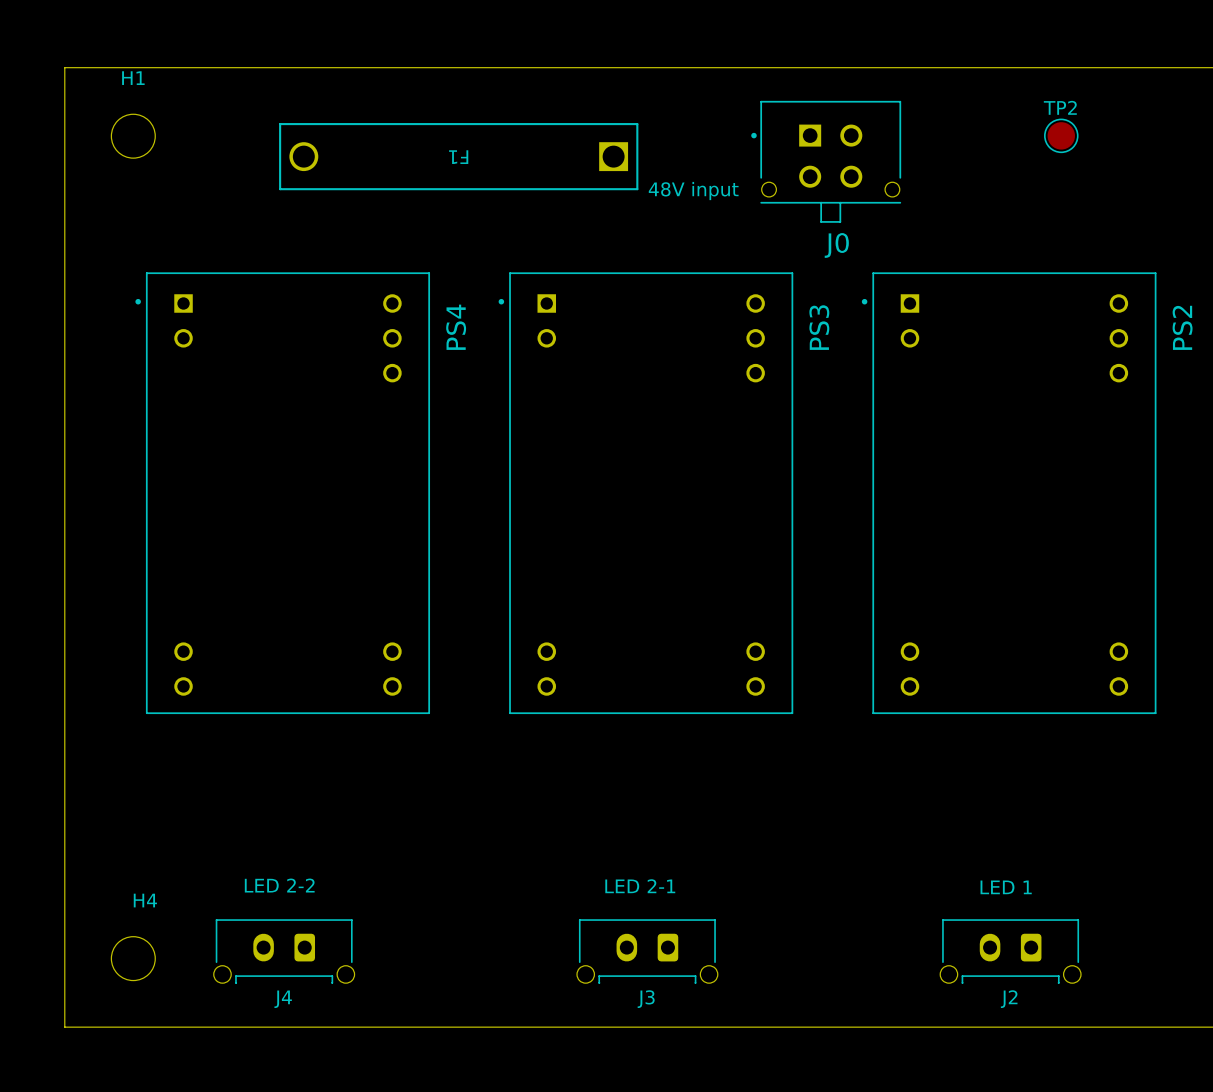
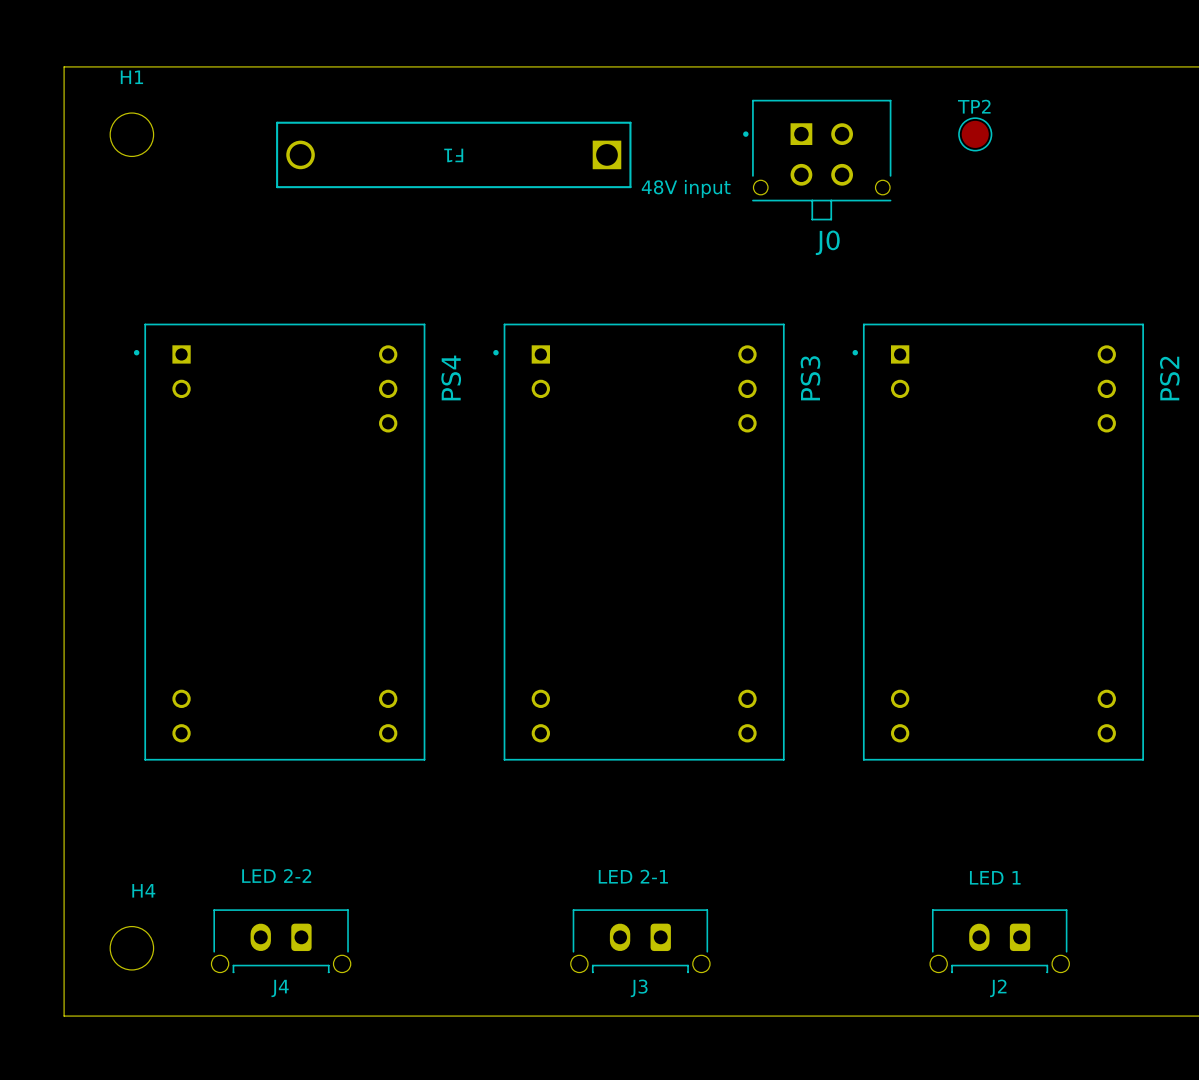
TP2 position: (1061, 135) -> (975, 134)
PS4 position: (282, 493) -> (279, 542)
PS3 position: (645, 493) -> (638, 542)
PS2 position: (1009, 493) -> (998, 542)

